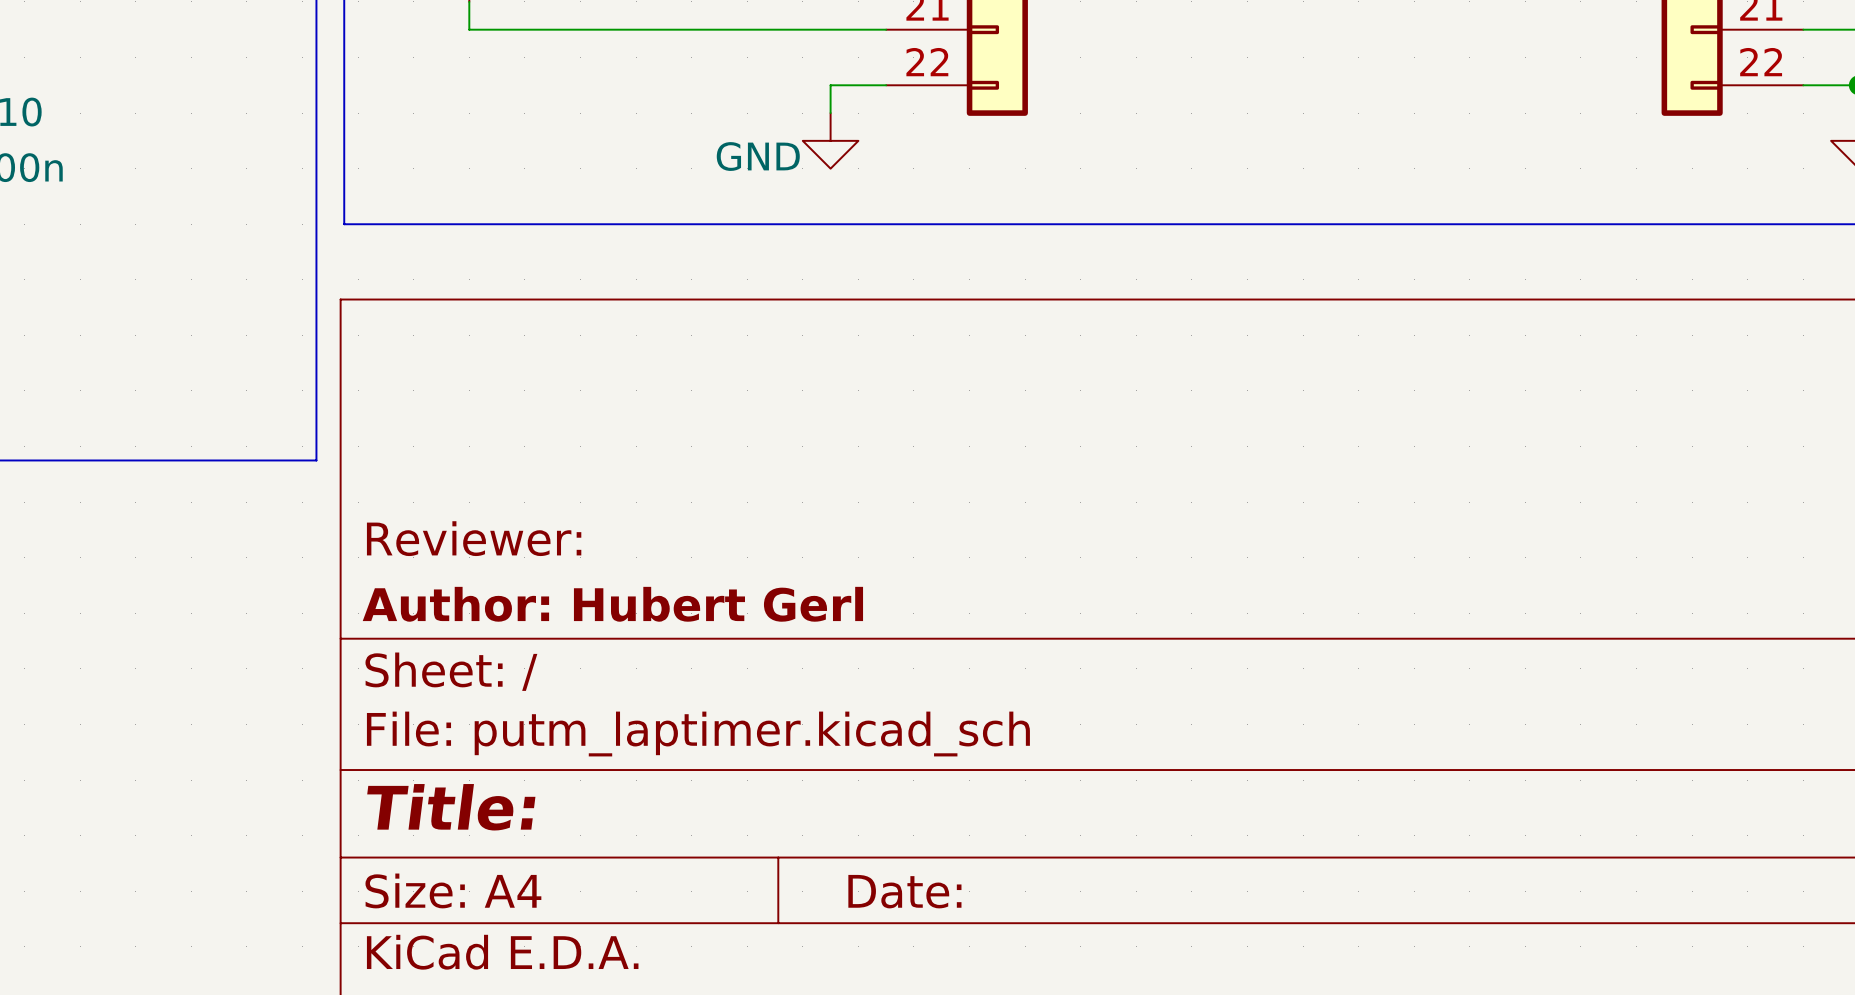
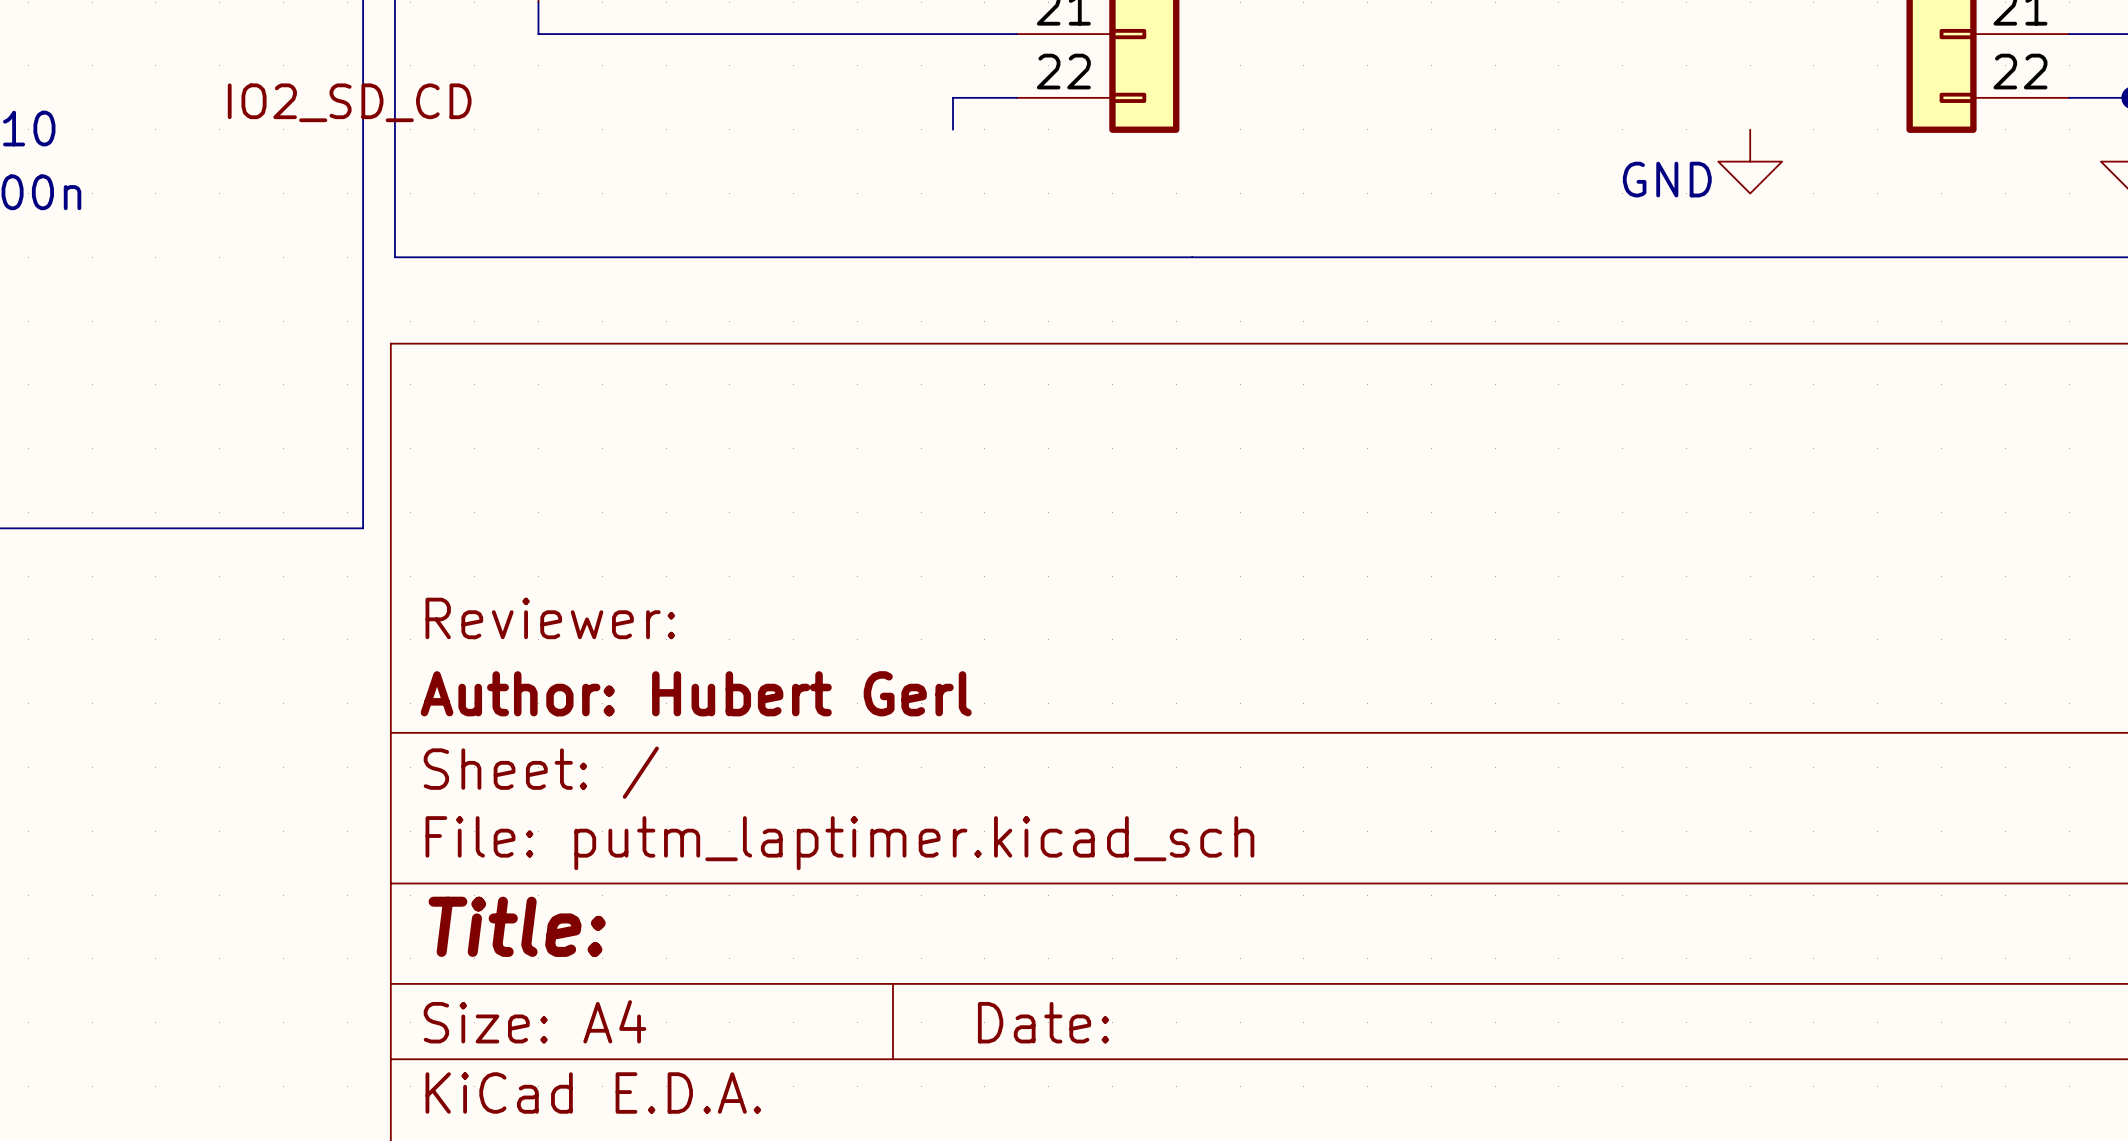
label: none -> IO2_SD_CD (349, 102)
power symbol: GND (830, 140) -> none
power symbol: none -> GND (1750, 161)

